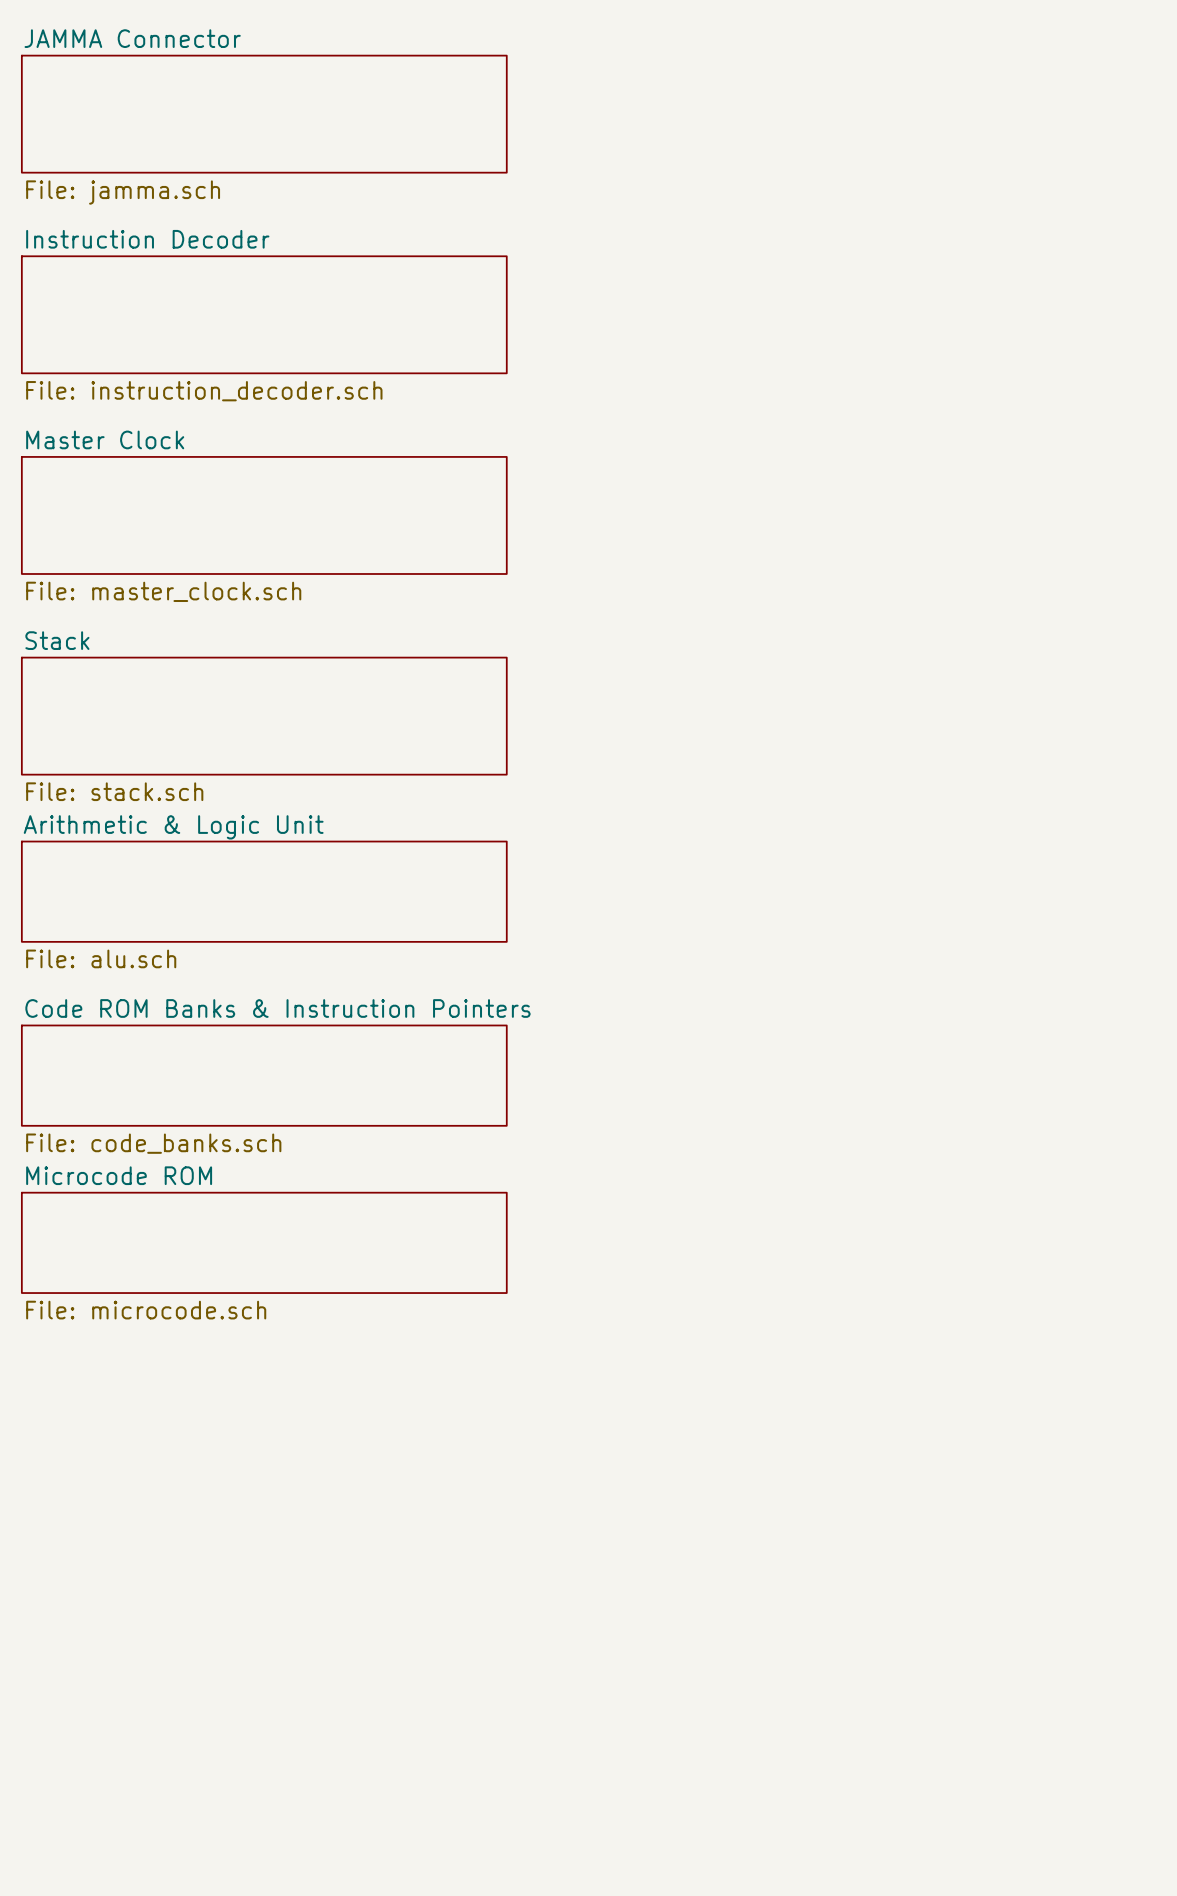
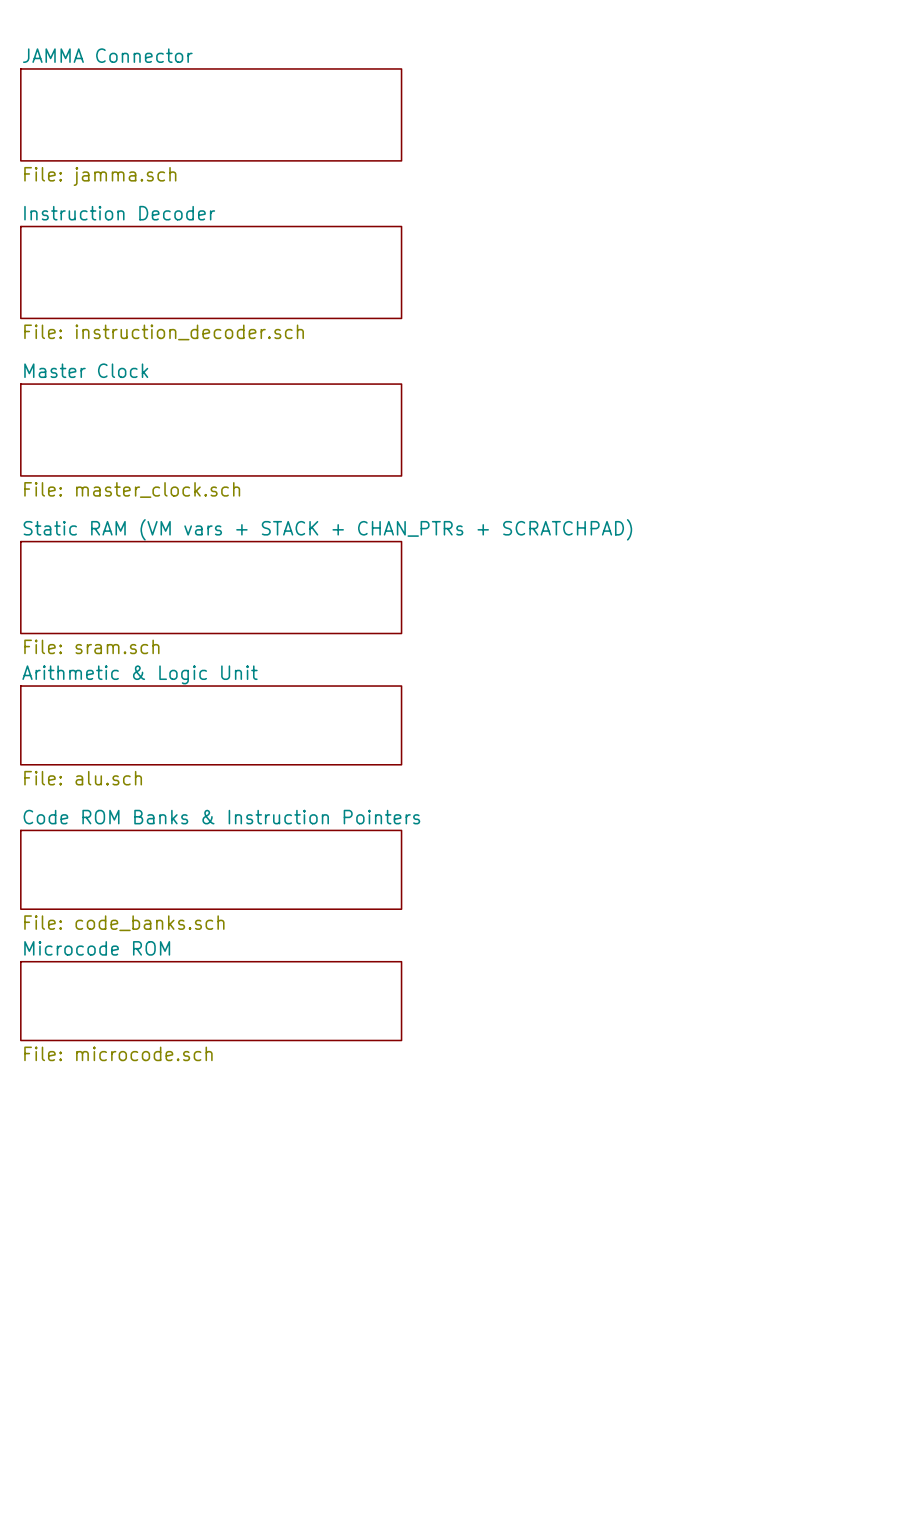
sheet Stack name: Stack (57, 640) -> Static RAM (VM vars + STACK + CHAN_PTRs + SCRATCHPAD) (327, 529)
sheet Stack value: File: stack.sch (114, 791) -> File: sram.sch (91, 646)

